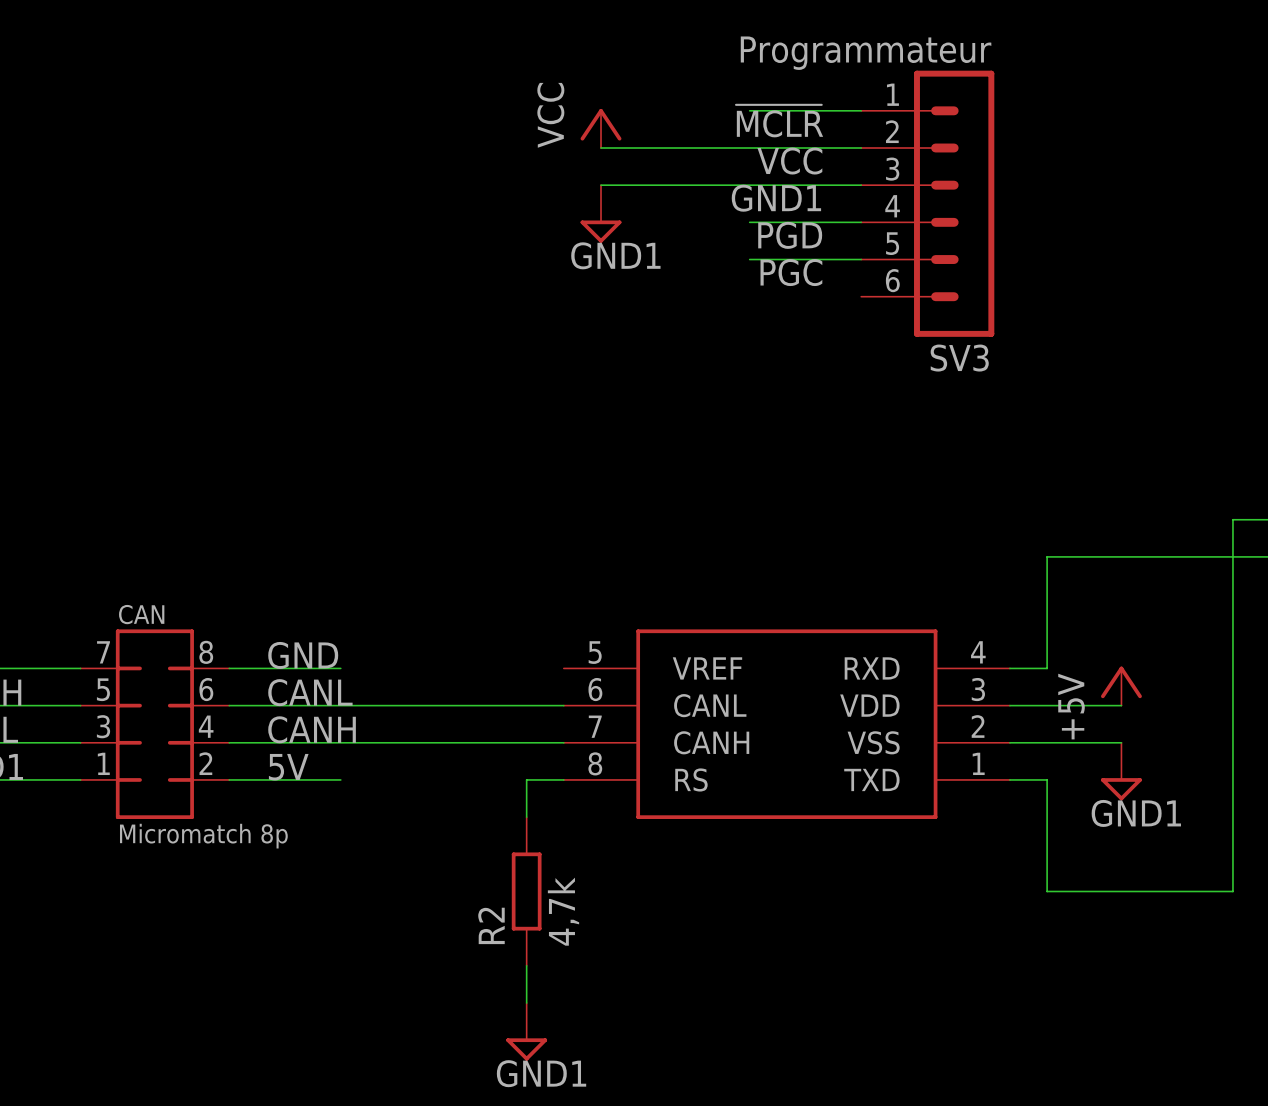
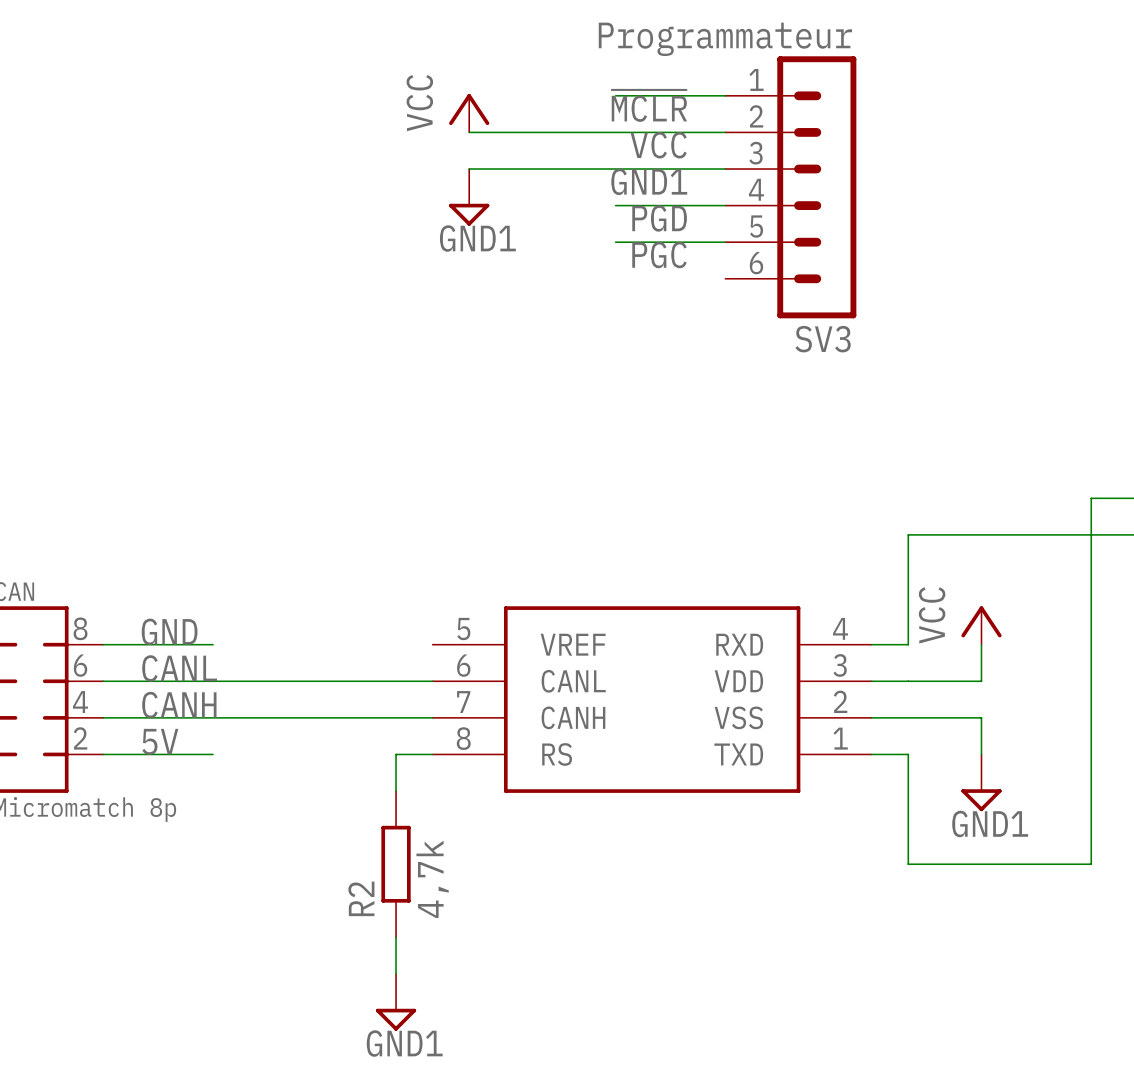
power symbol: none -> VCC (981, 625)
power symbol: +5V (1121, 686) -> none
power symbol position: GND1 (1121, 771) -> GND1 (981, 782)

